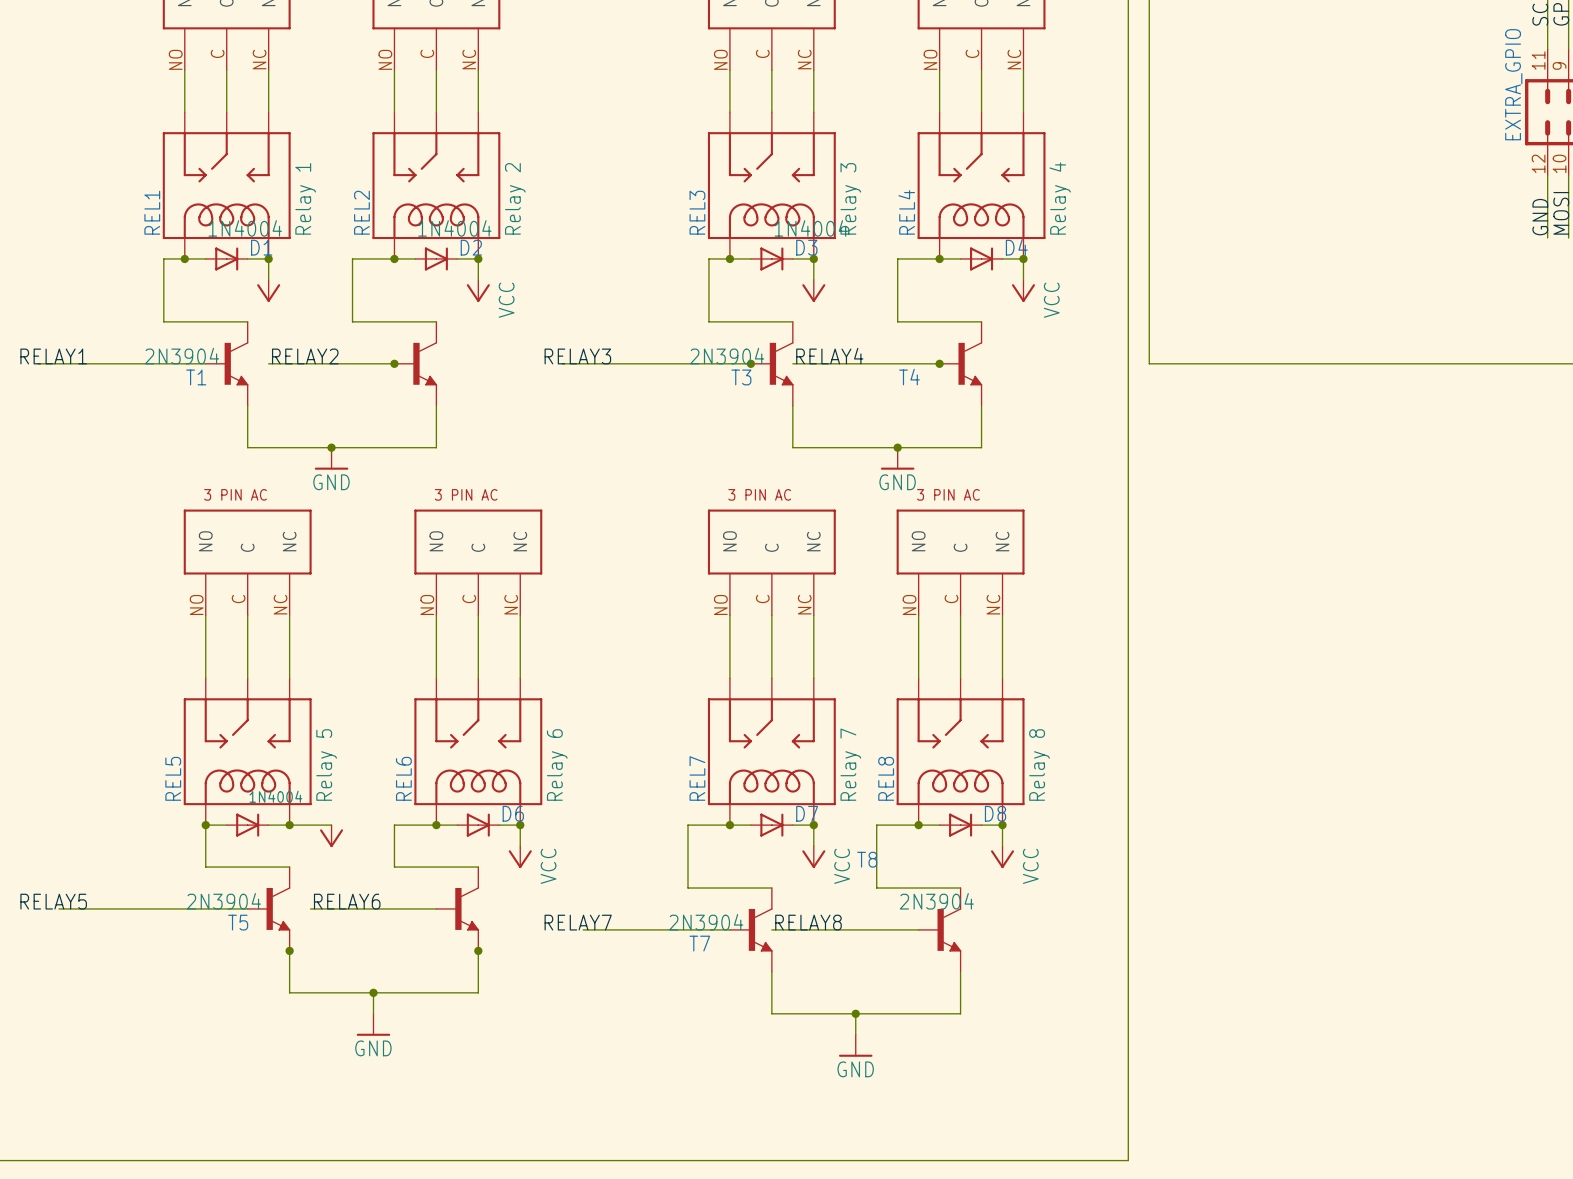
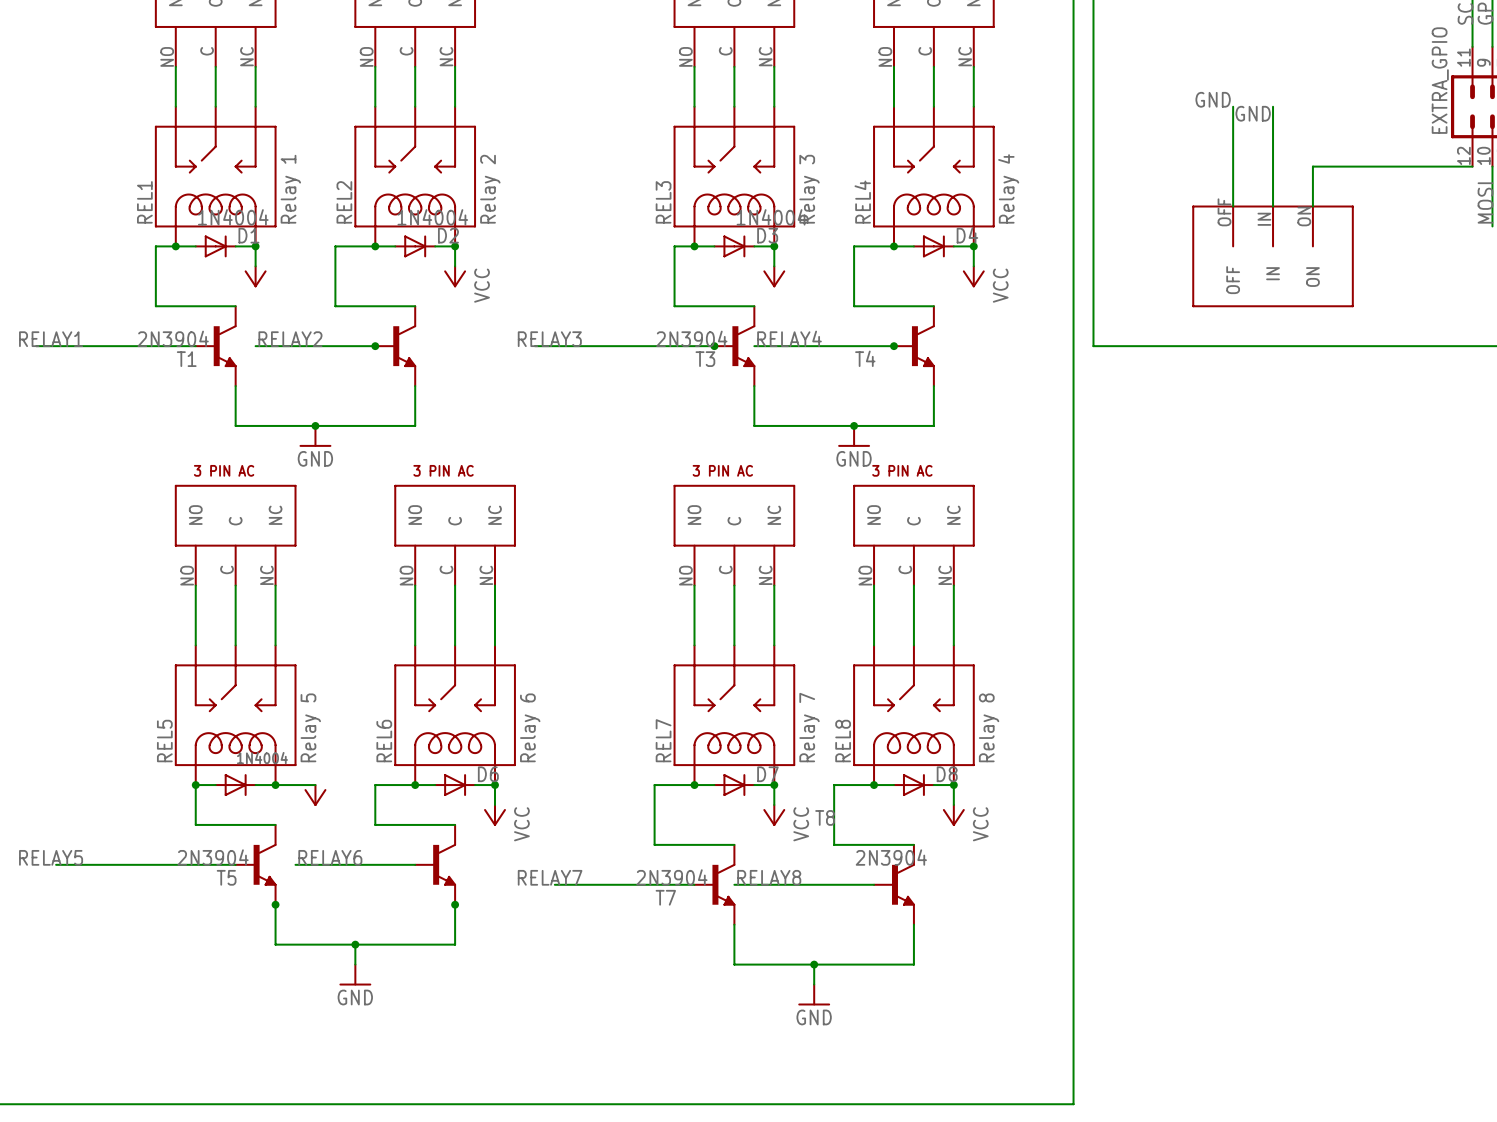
label: none -> GND (1213, 99)
wire: none -> (1233, 106) (1233, 206)
wire: none -> (1273, 106) (1273, 206)
label: none -> GND (1253, 113)
wire: (1547, 175) (1547, 238) -> (1472, 166) (1312, 166) (1312, 206)
label: GND (1540, 217) -> none
part: none -> (1273, 256)

